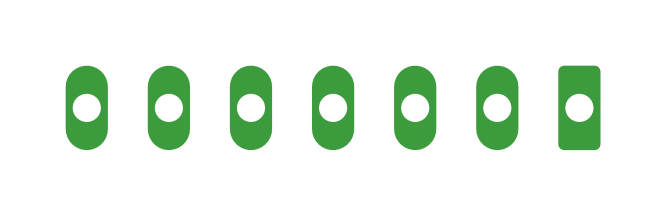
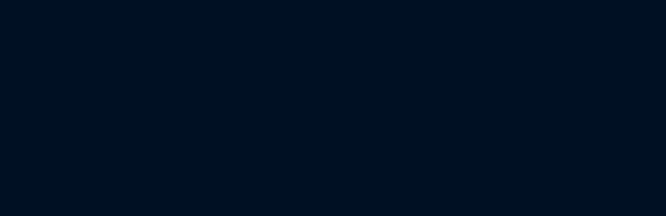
part: (333, 107) -> none

